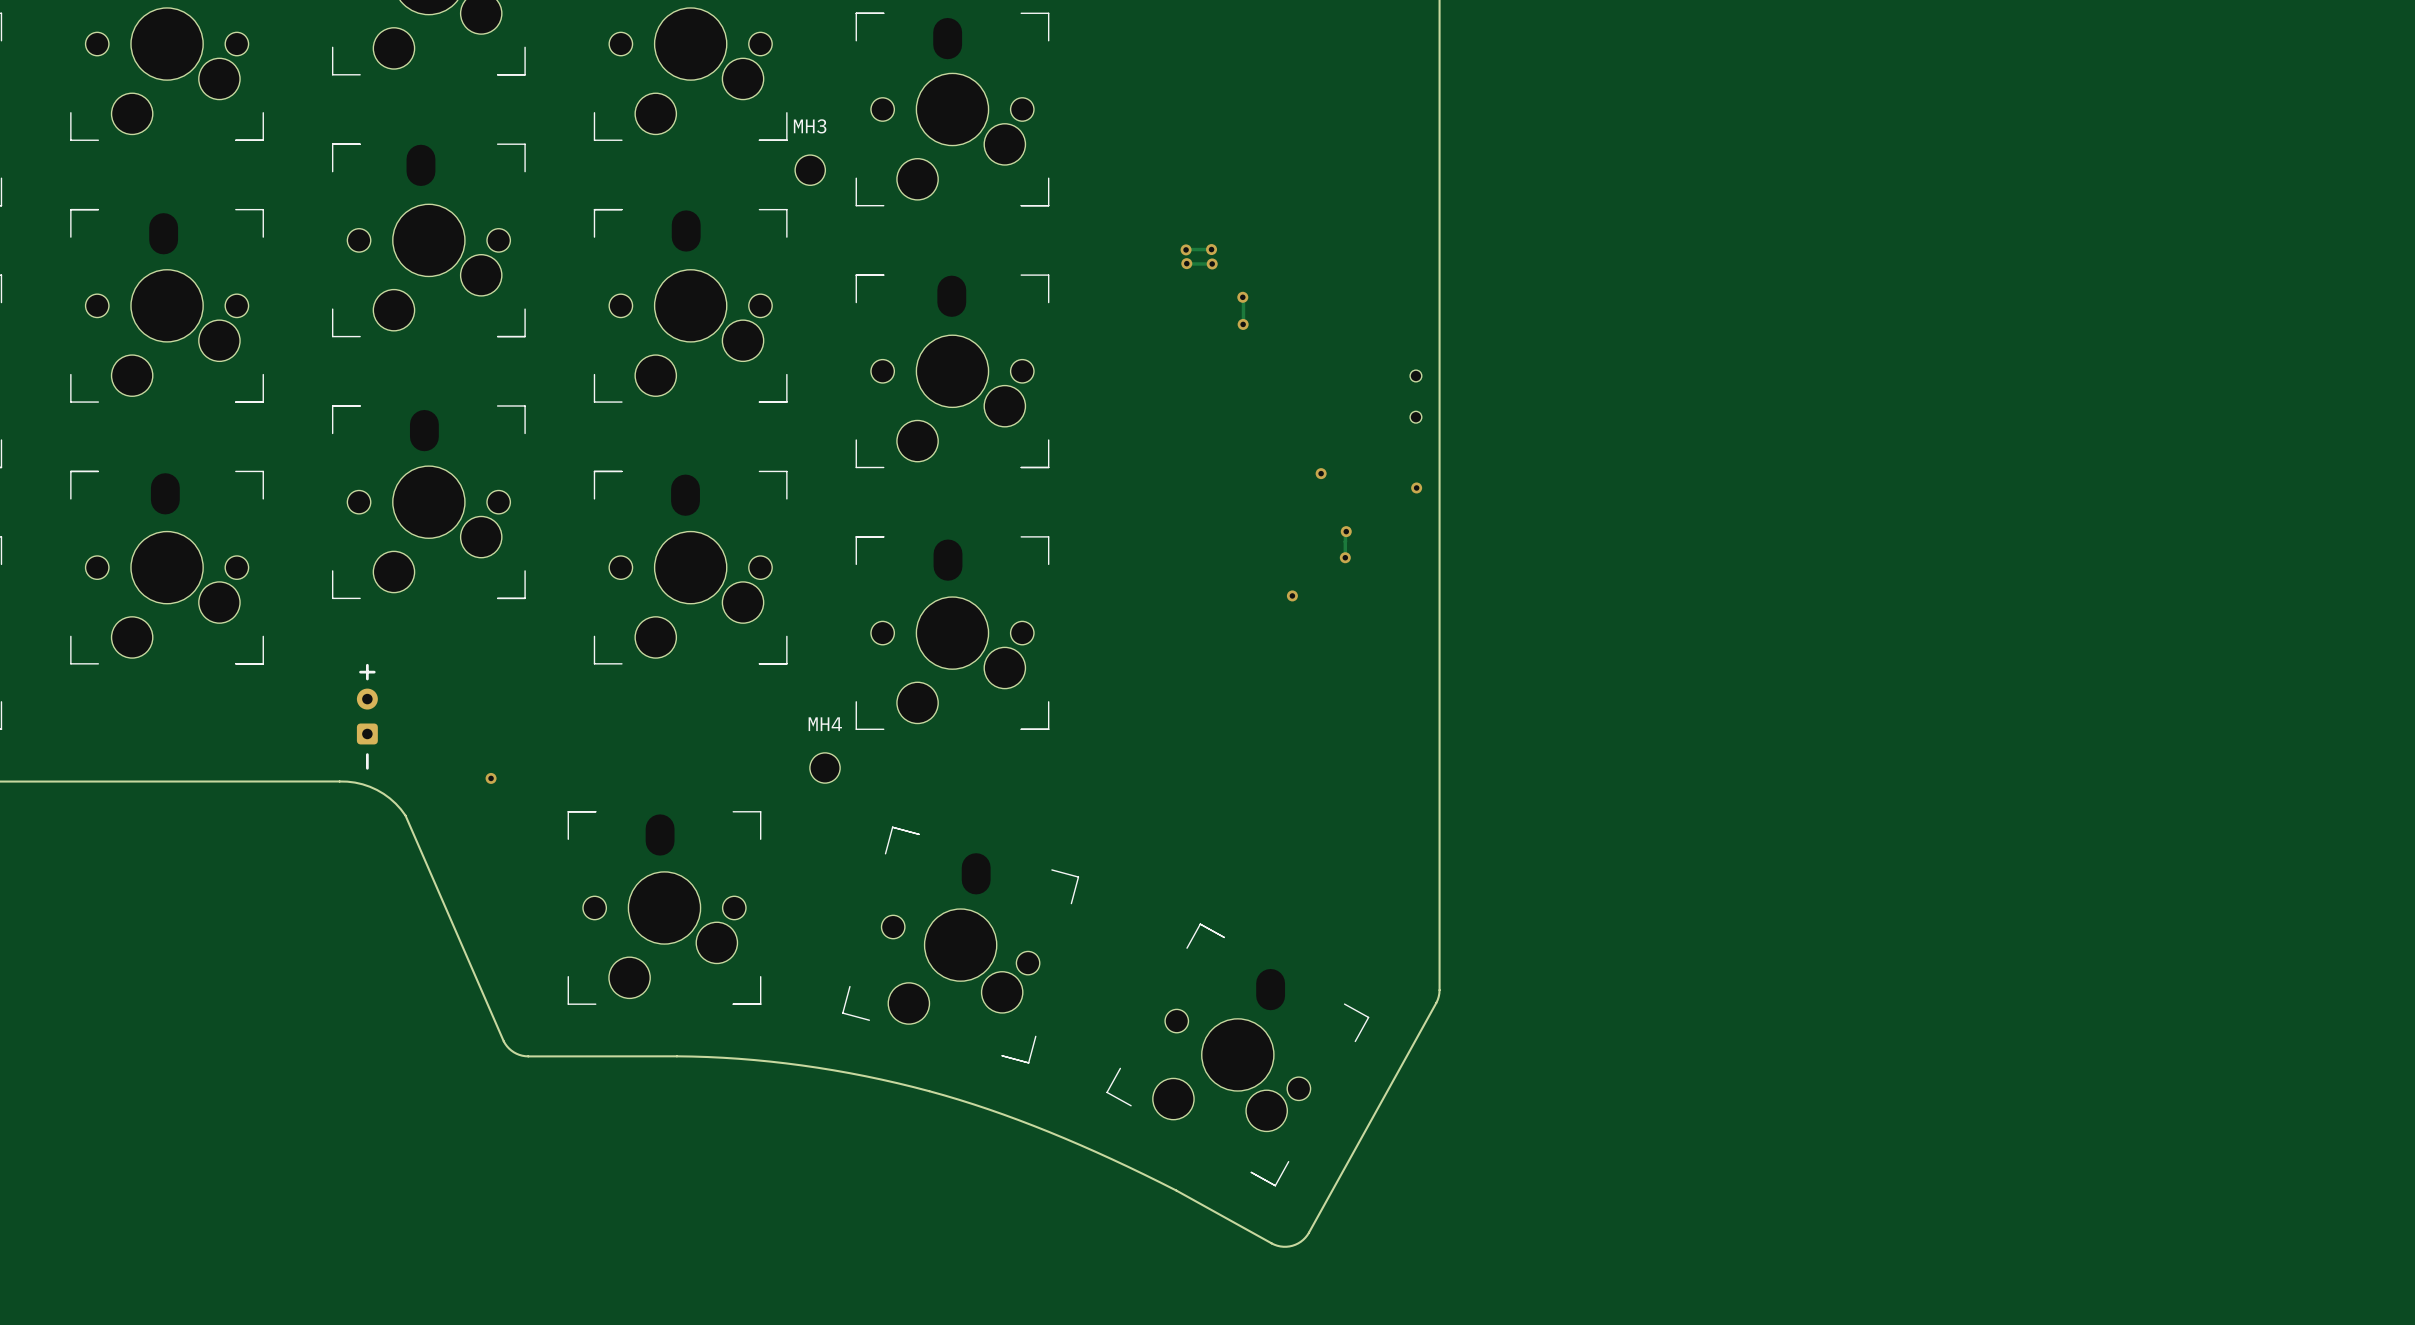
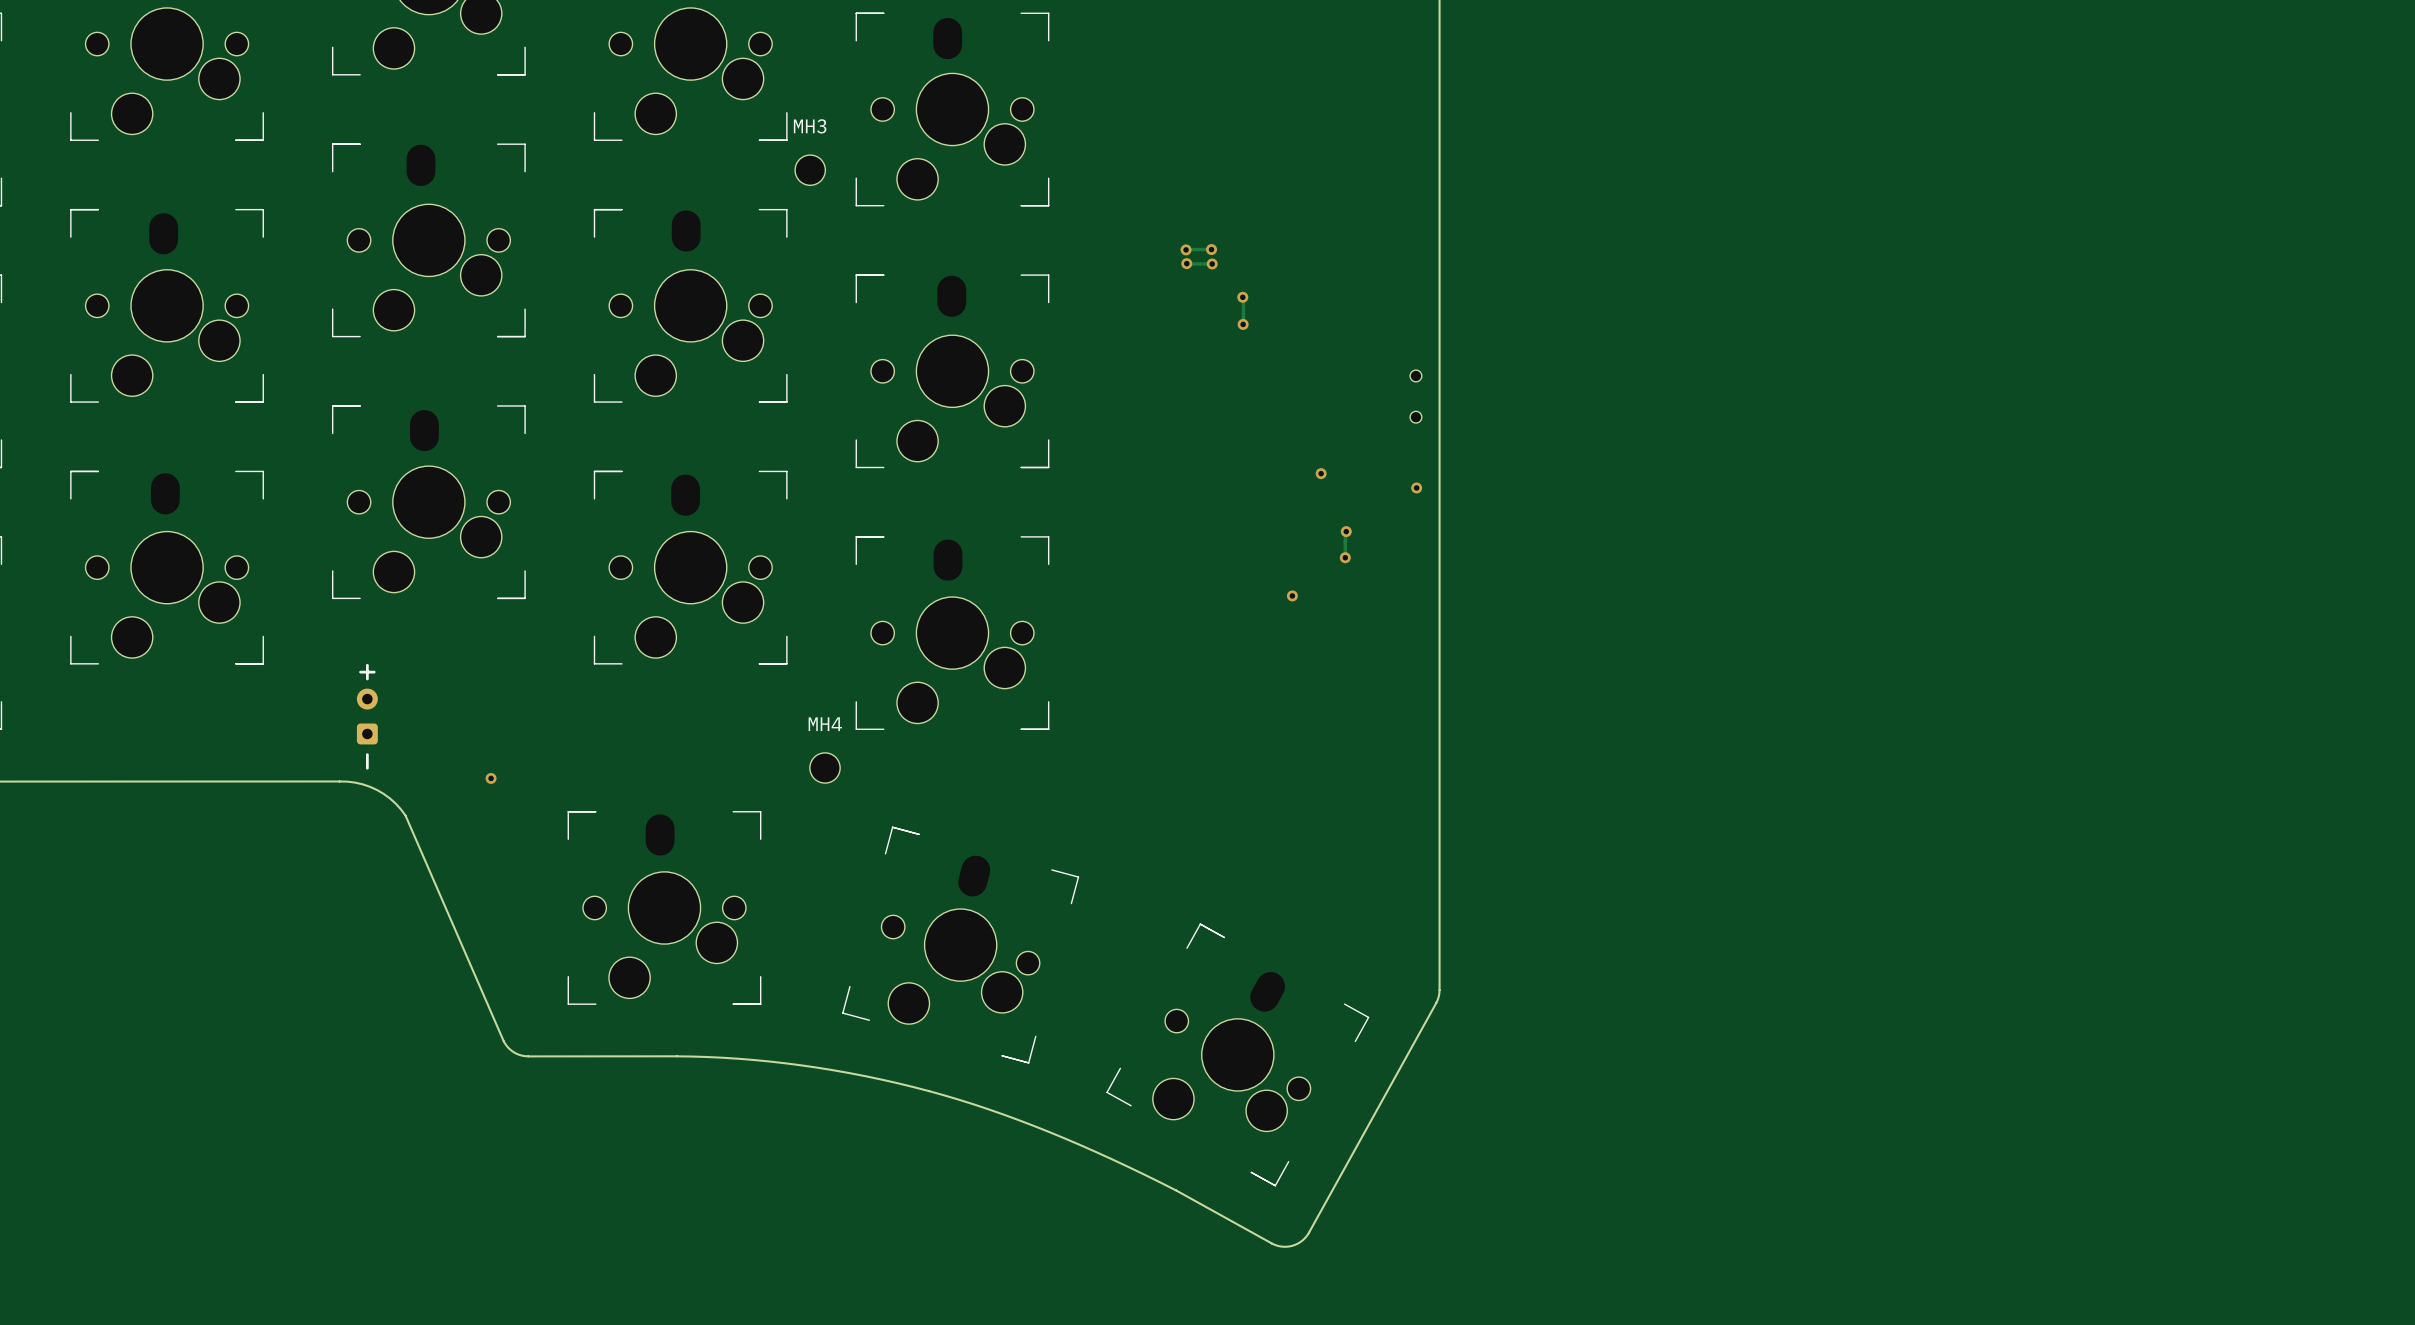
part rotation: 0° (976, 873) -> 15° clockwise (974, 876)
part rotation: 0° (1270, 989) -> 29° clockwise (1267, 991)

